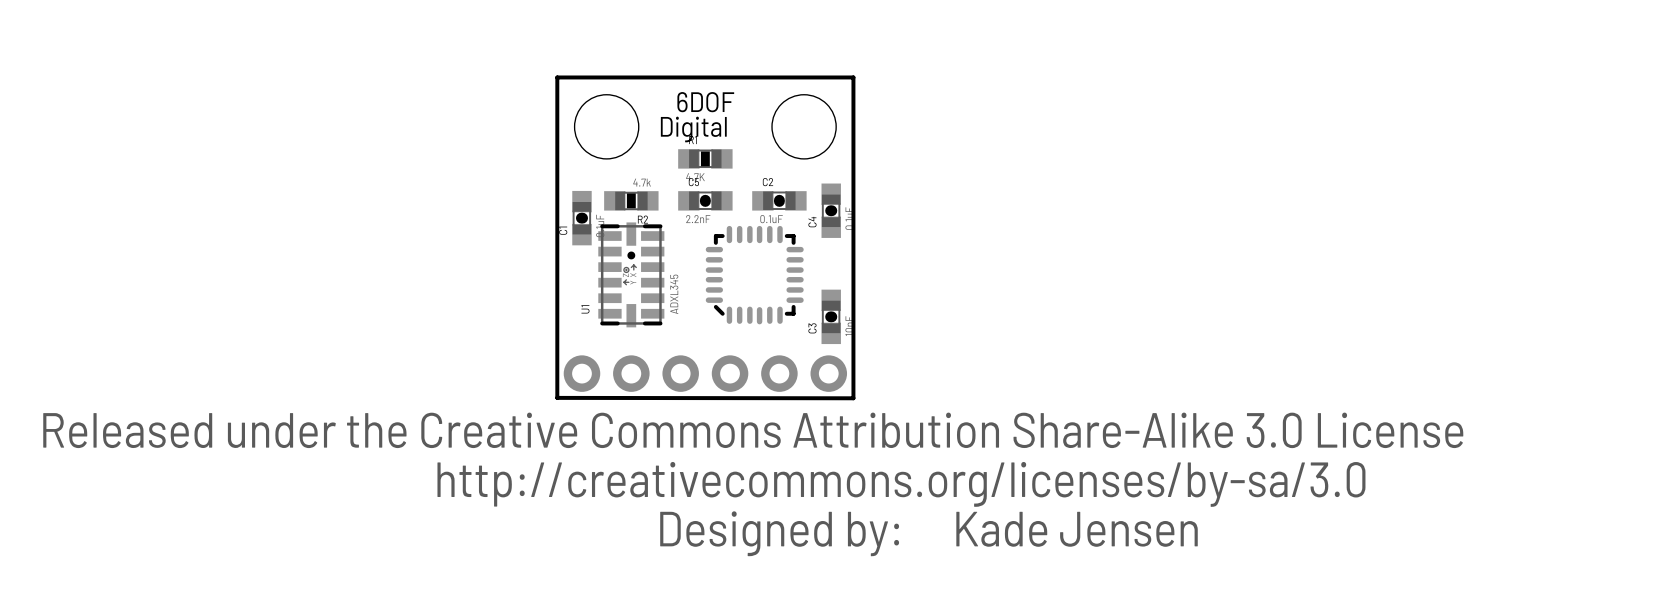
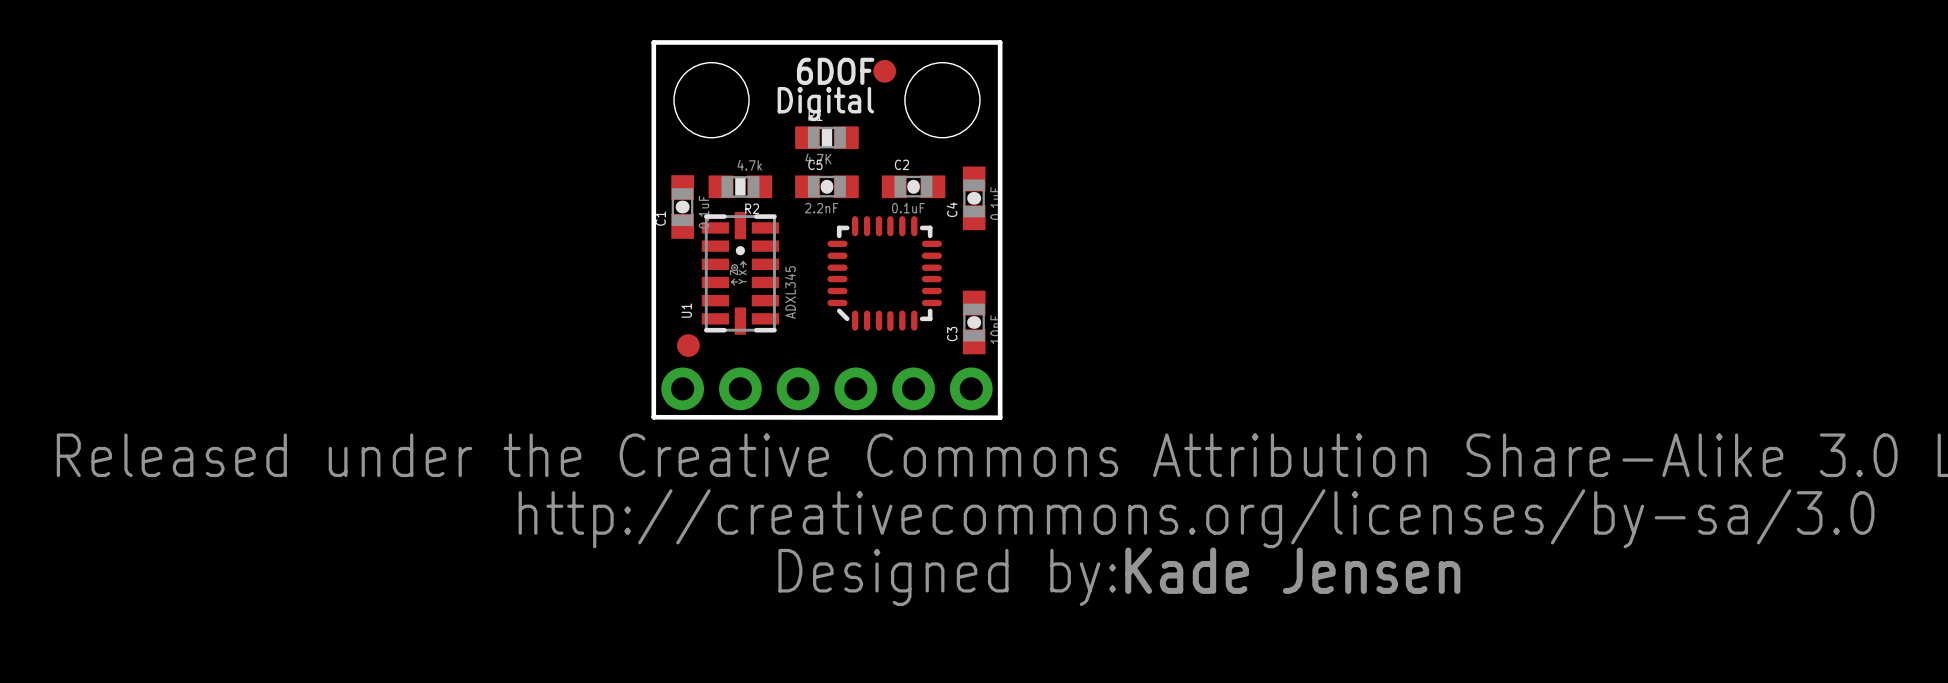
part: none -> (884, 71)
part: none -> (688, 345)

